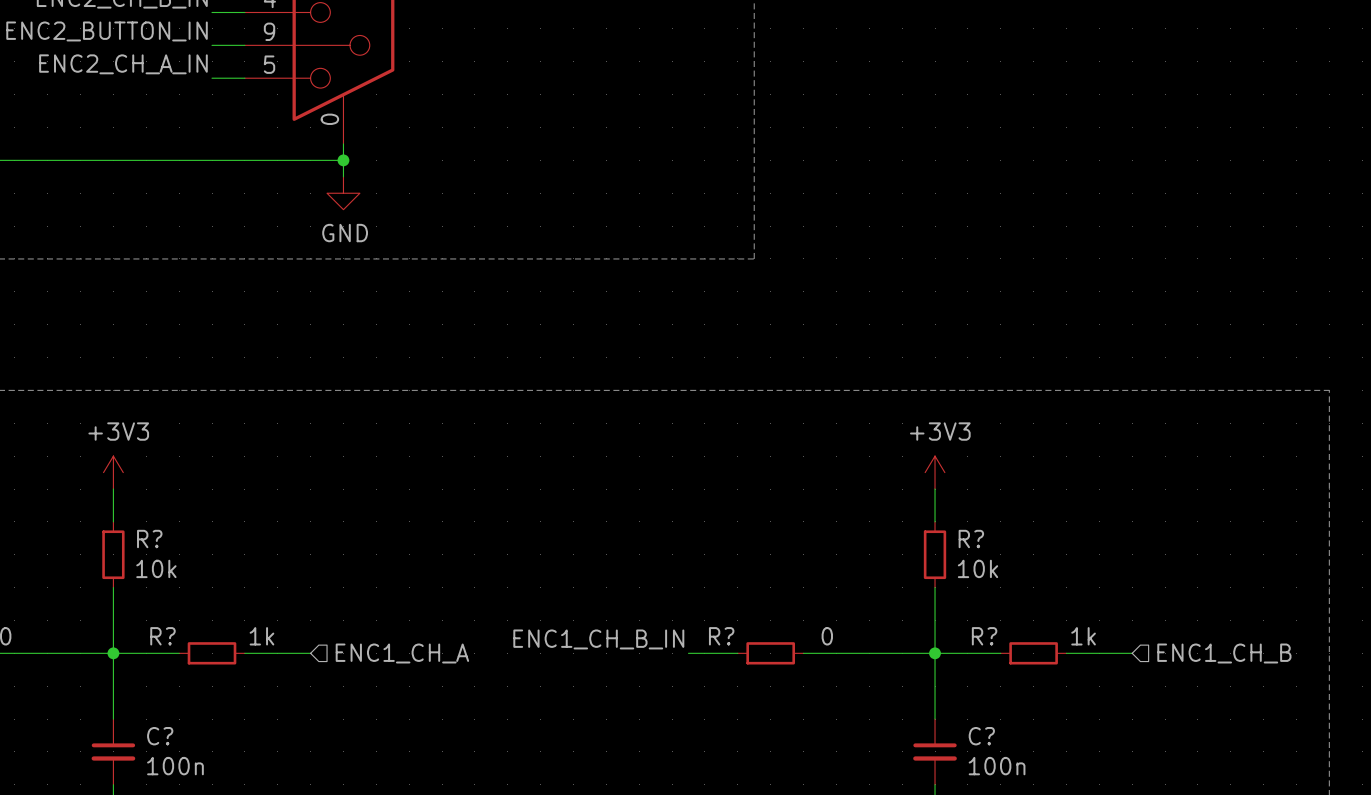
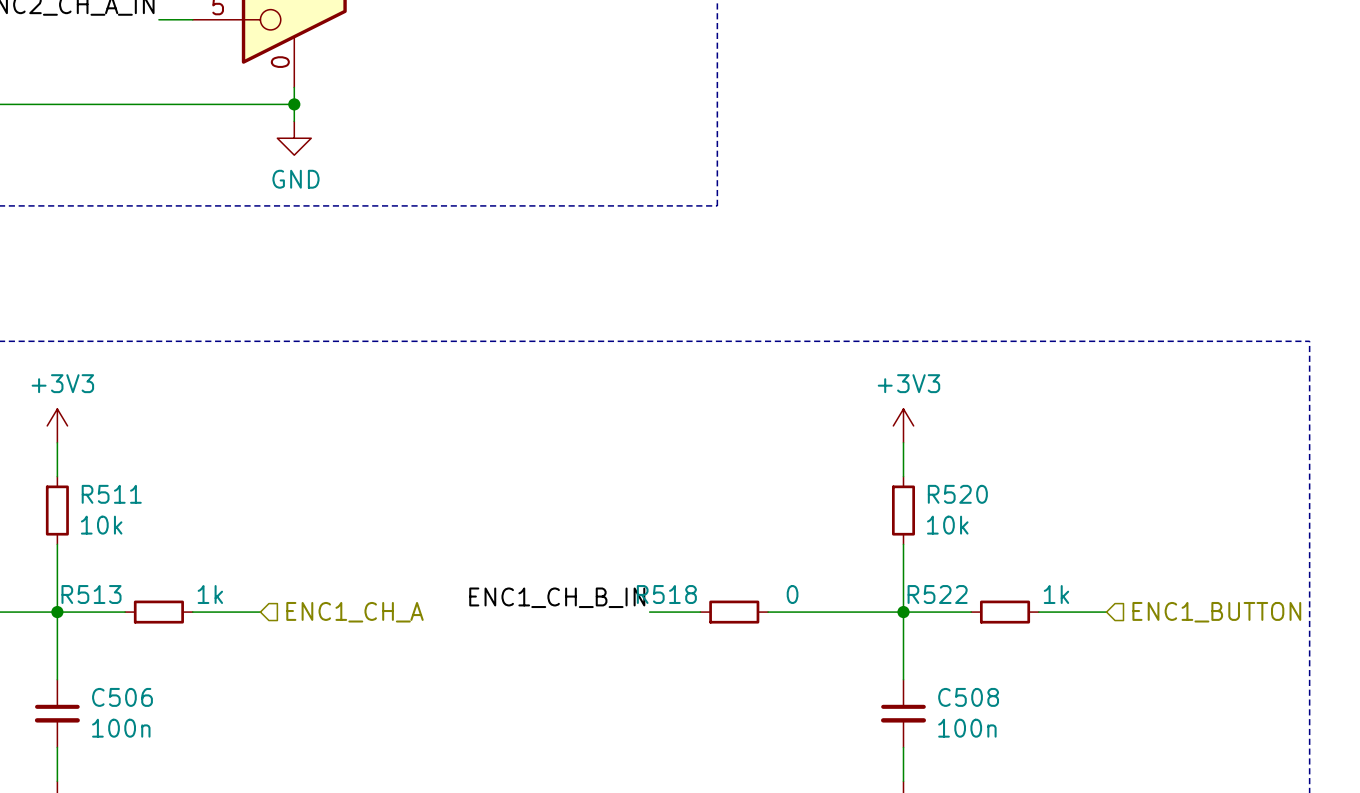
R? name: R? (149, 539) -> R511 (111, 494)
R? name: R? (971, 539) -> R520 (957, 494)
R? name: R? (162, 636) -> R513 (91, 594)
R? name: R? (721, 636) -> R518 (666, 594)
R? name: R? (984, 636) -> R522 (937, 594)
hierarchical label: ENC1_CH_B (1224, 653) -> ENC1_BUTTON (1216, 612)
C? name: C? (160, 736) -> C506 (122, 697)
C? name: C? (981, 736) -> C508 (968, 697)

